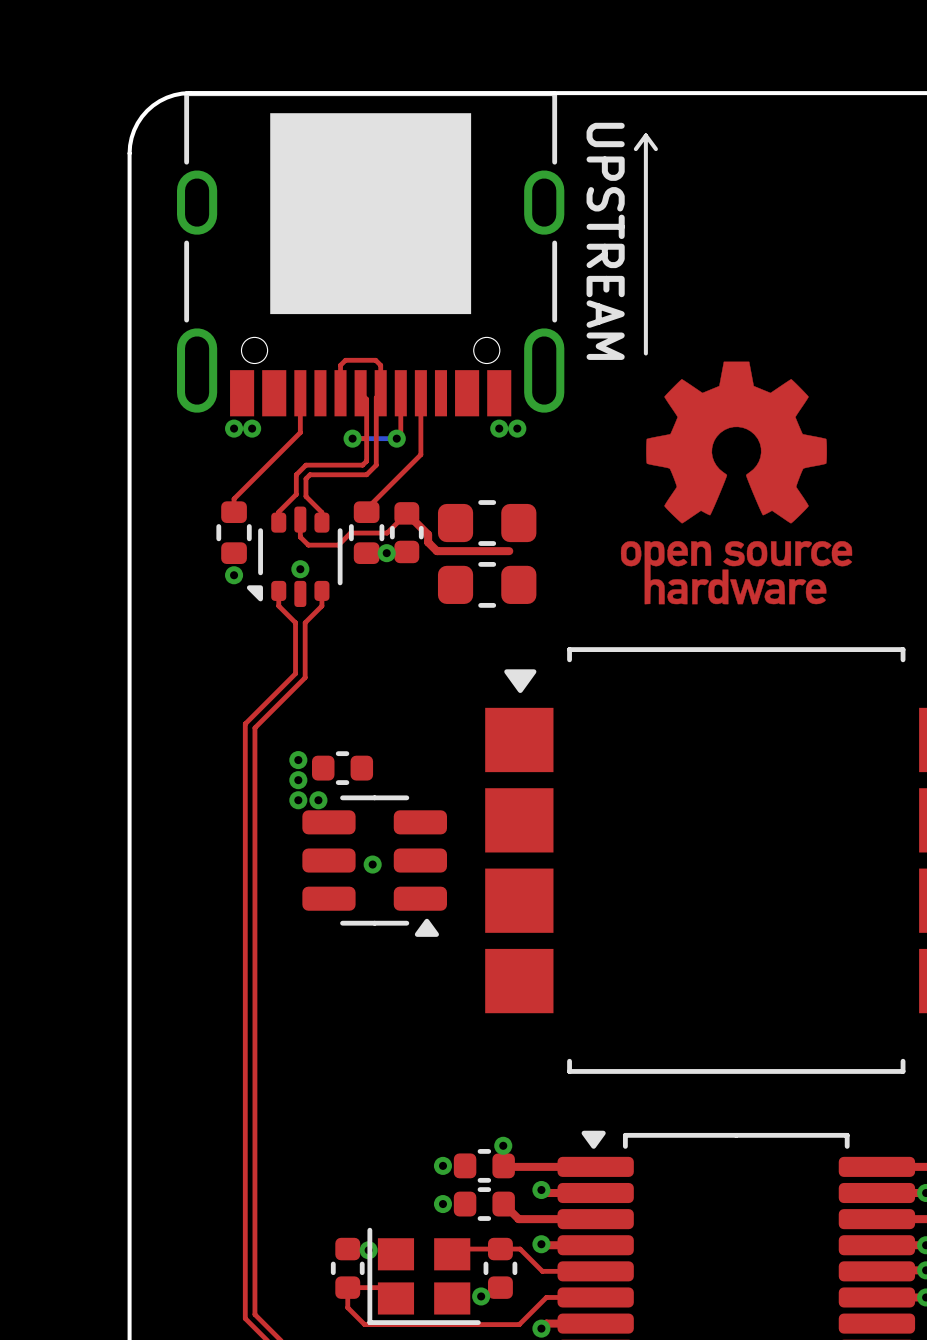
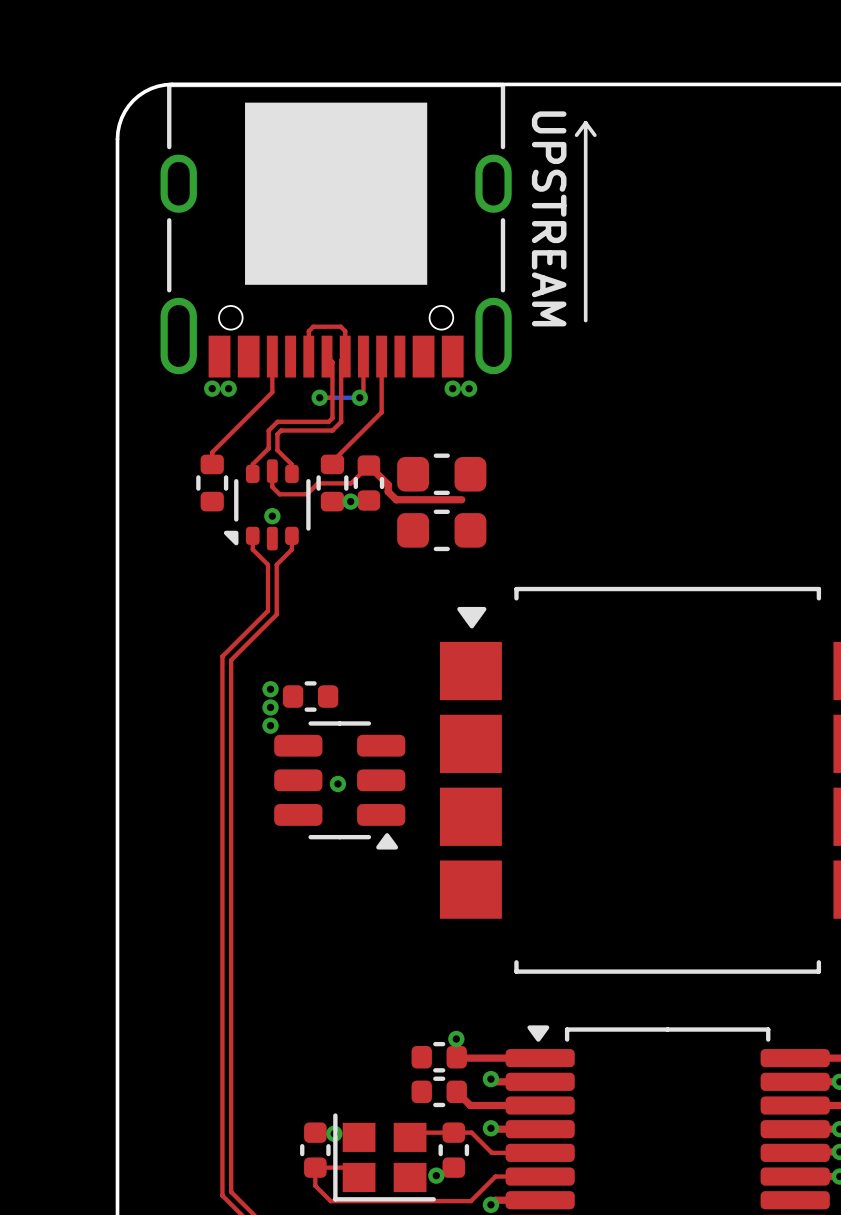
drawing: [620, 361, 853, 605] -> none
via: (234, 575) -> none
via: (318, 800) -> none
via: (442, 1165) -> none
via: (442, 1204) -> none

